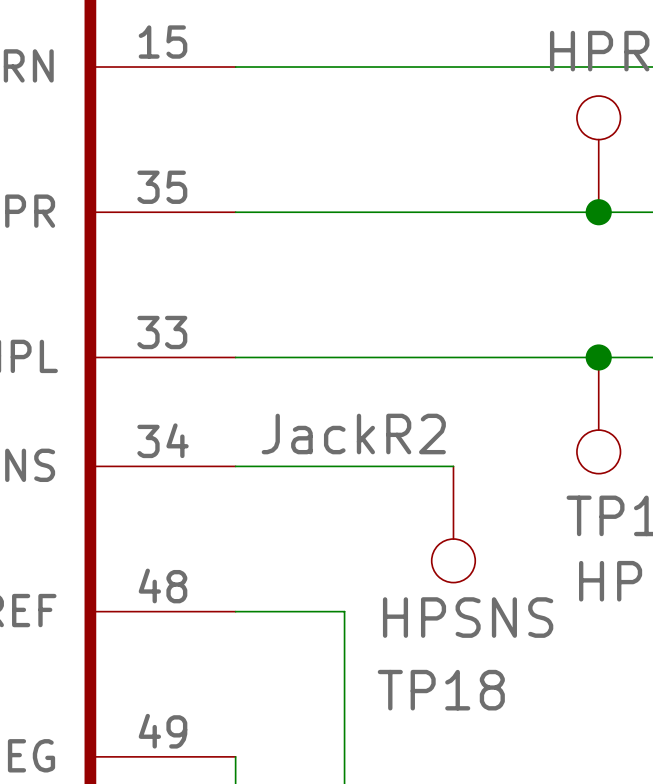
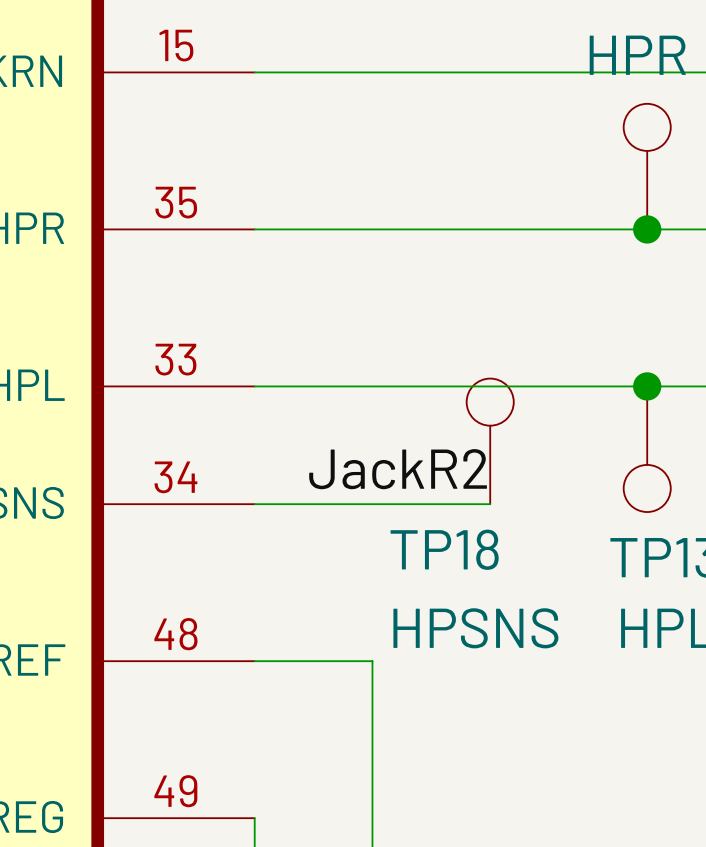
TP18 position: (453, 524) -> (490, 441)
TP18 rotation: 0° (453, 560) -> 180° (490, 402)
TP18 value position: HPSNS (468, 617) -> HPSNS (475, 628)
TP18 name position: TP18 (441, 690) -> TP18 (444, 549)

